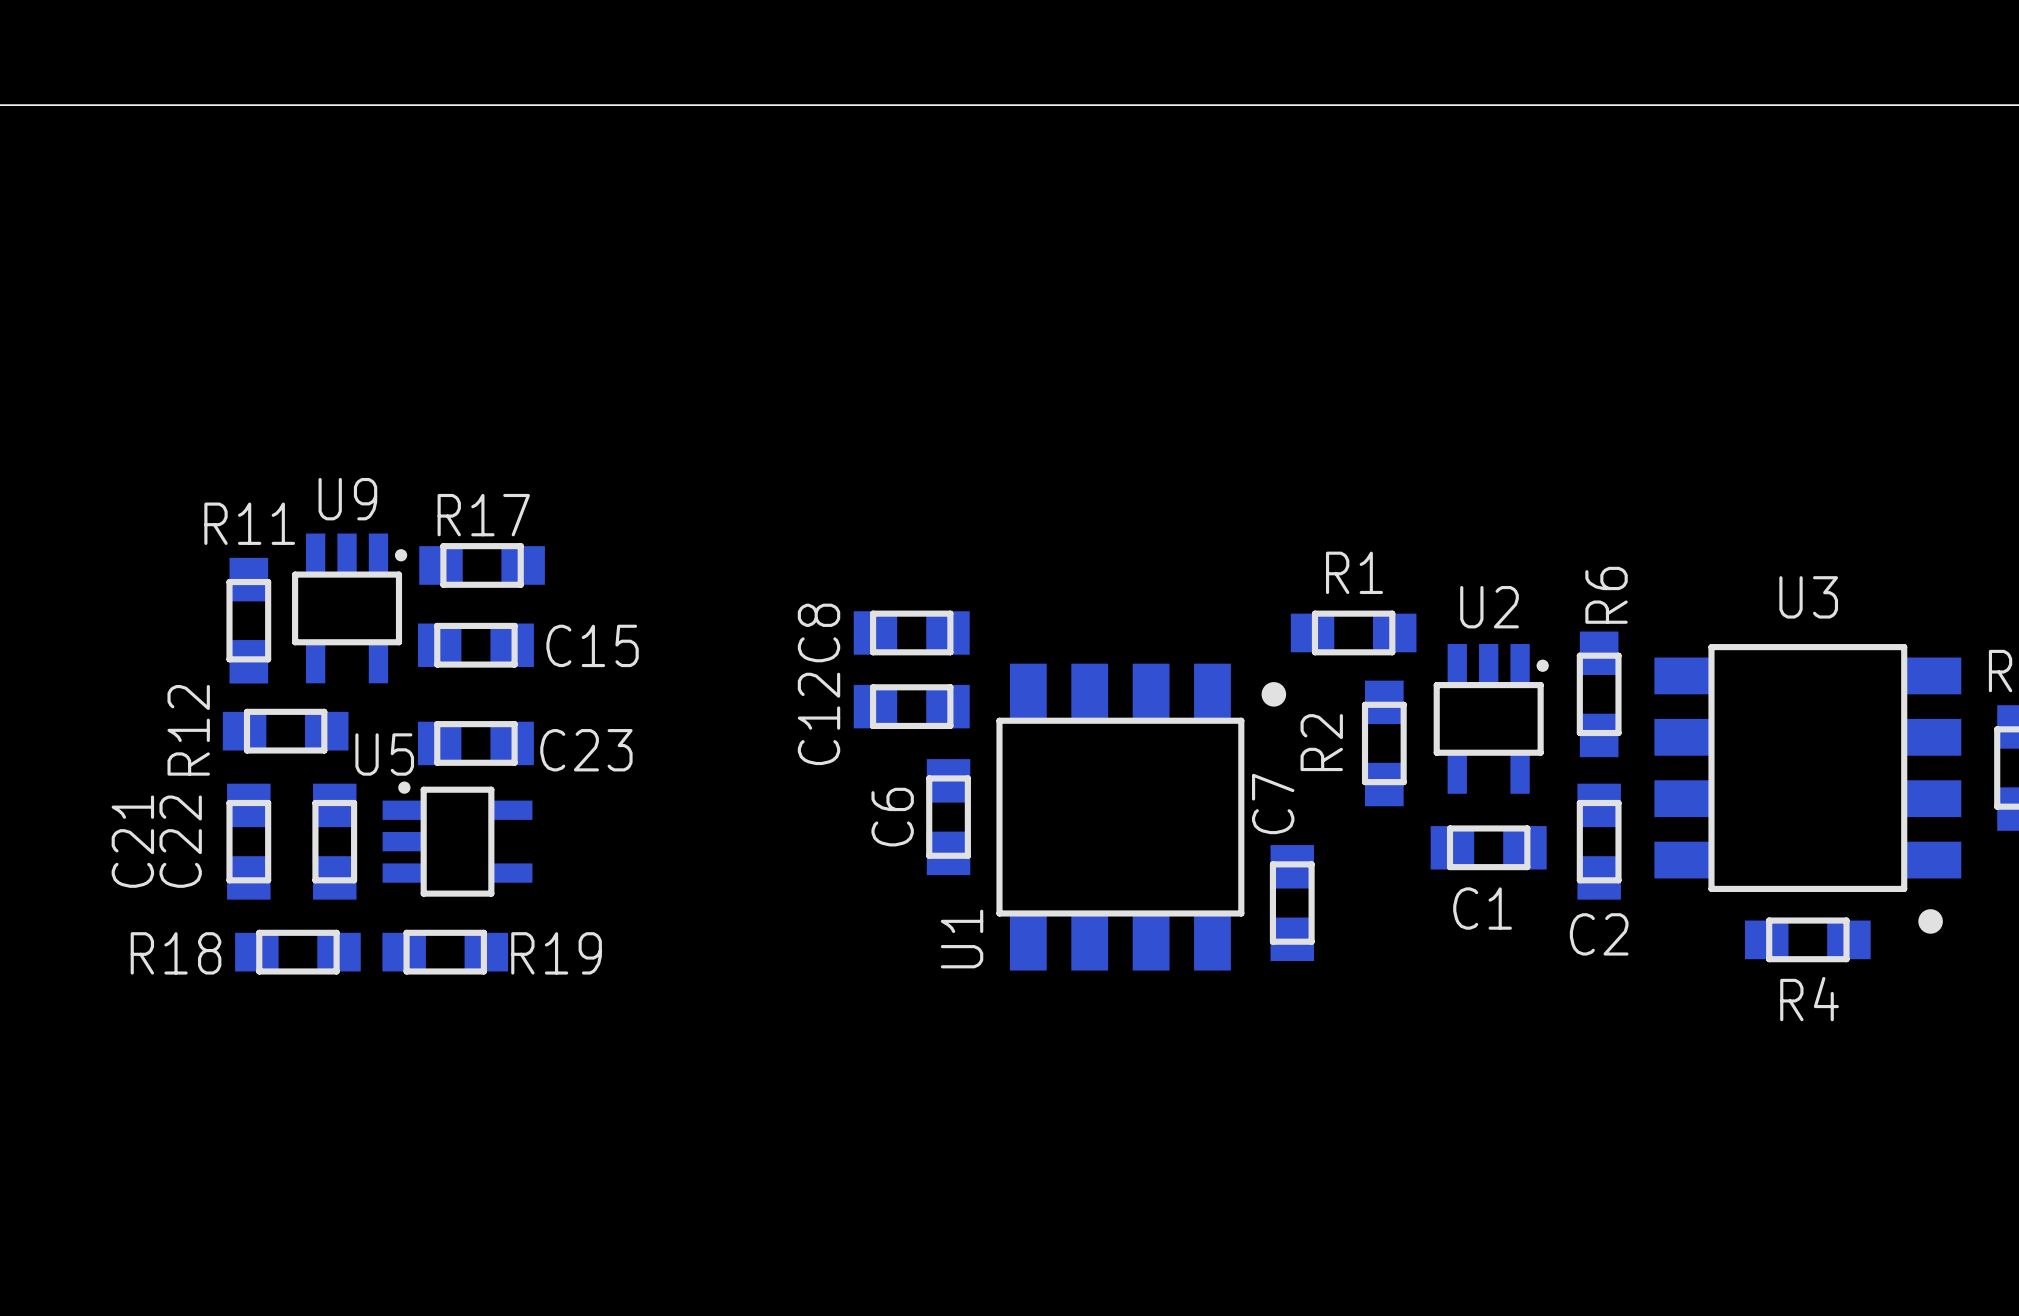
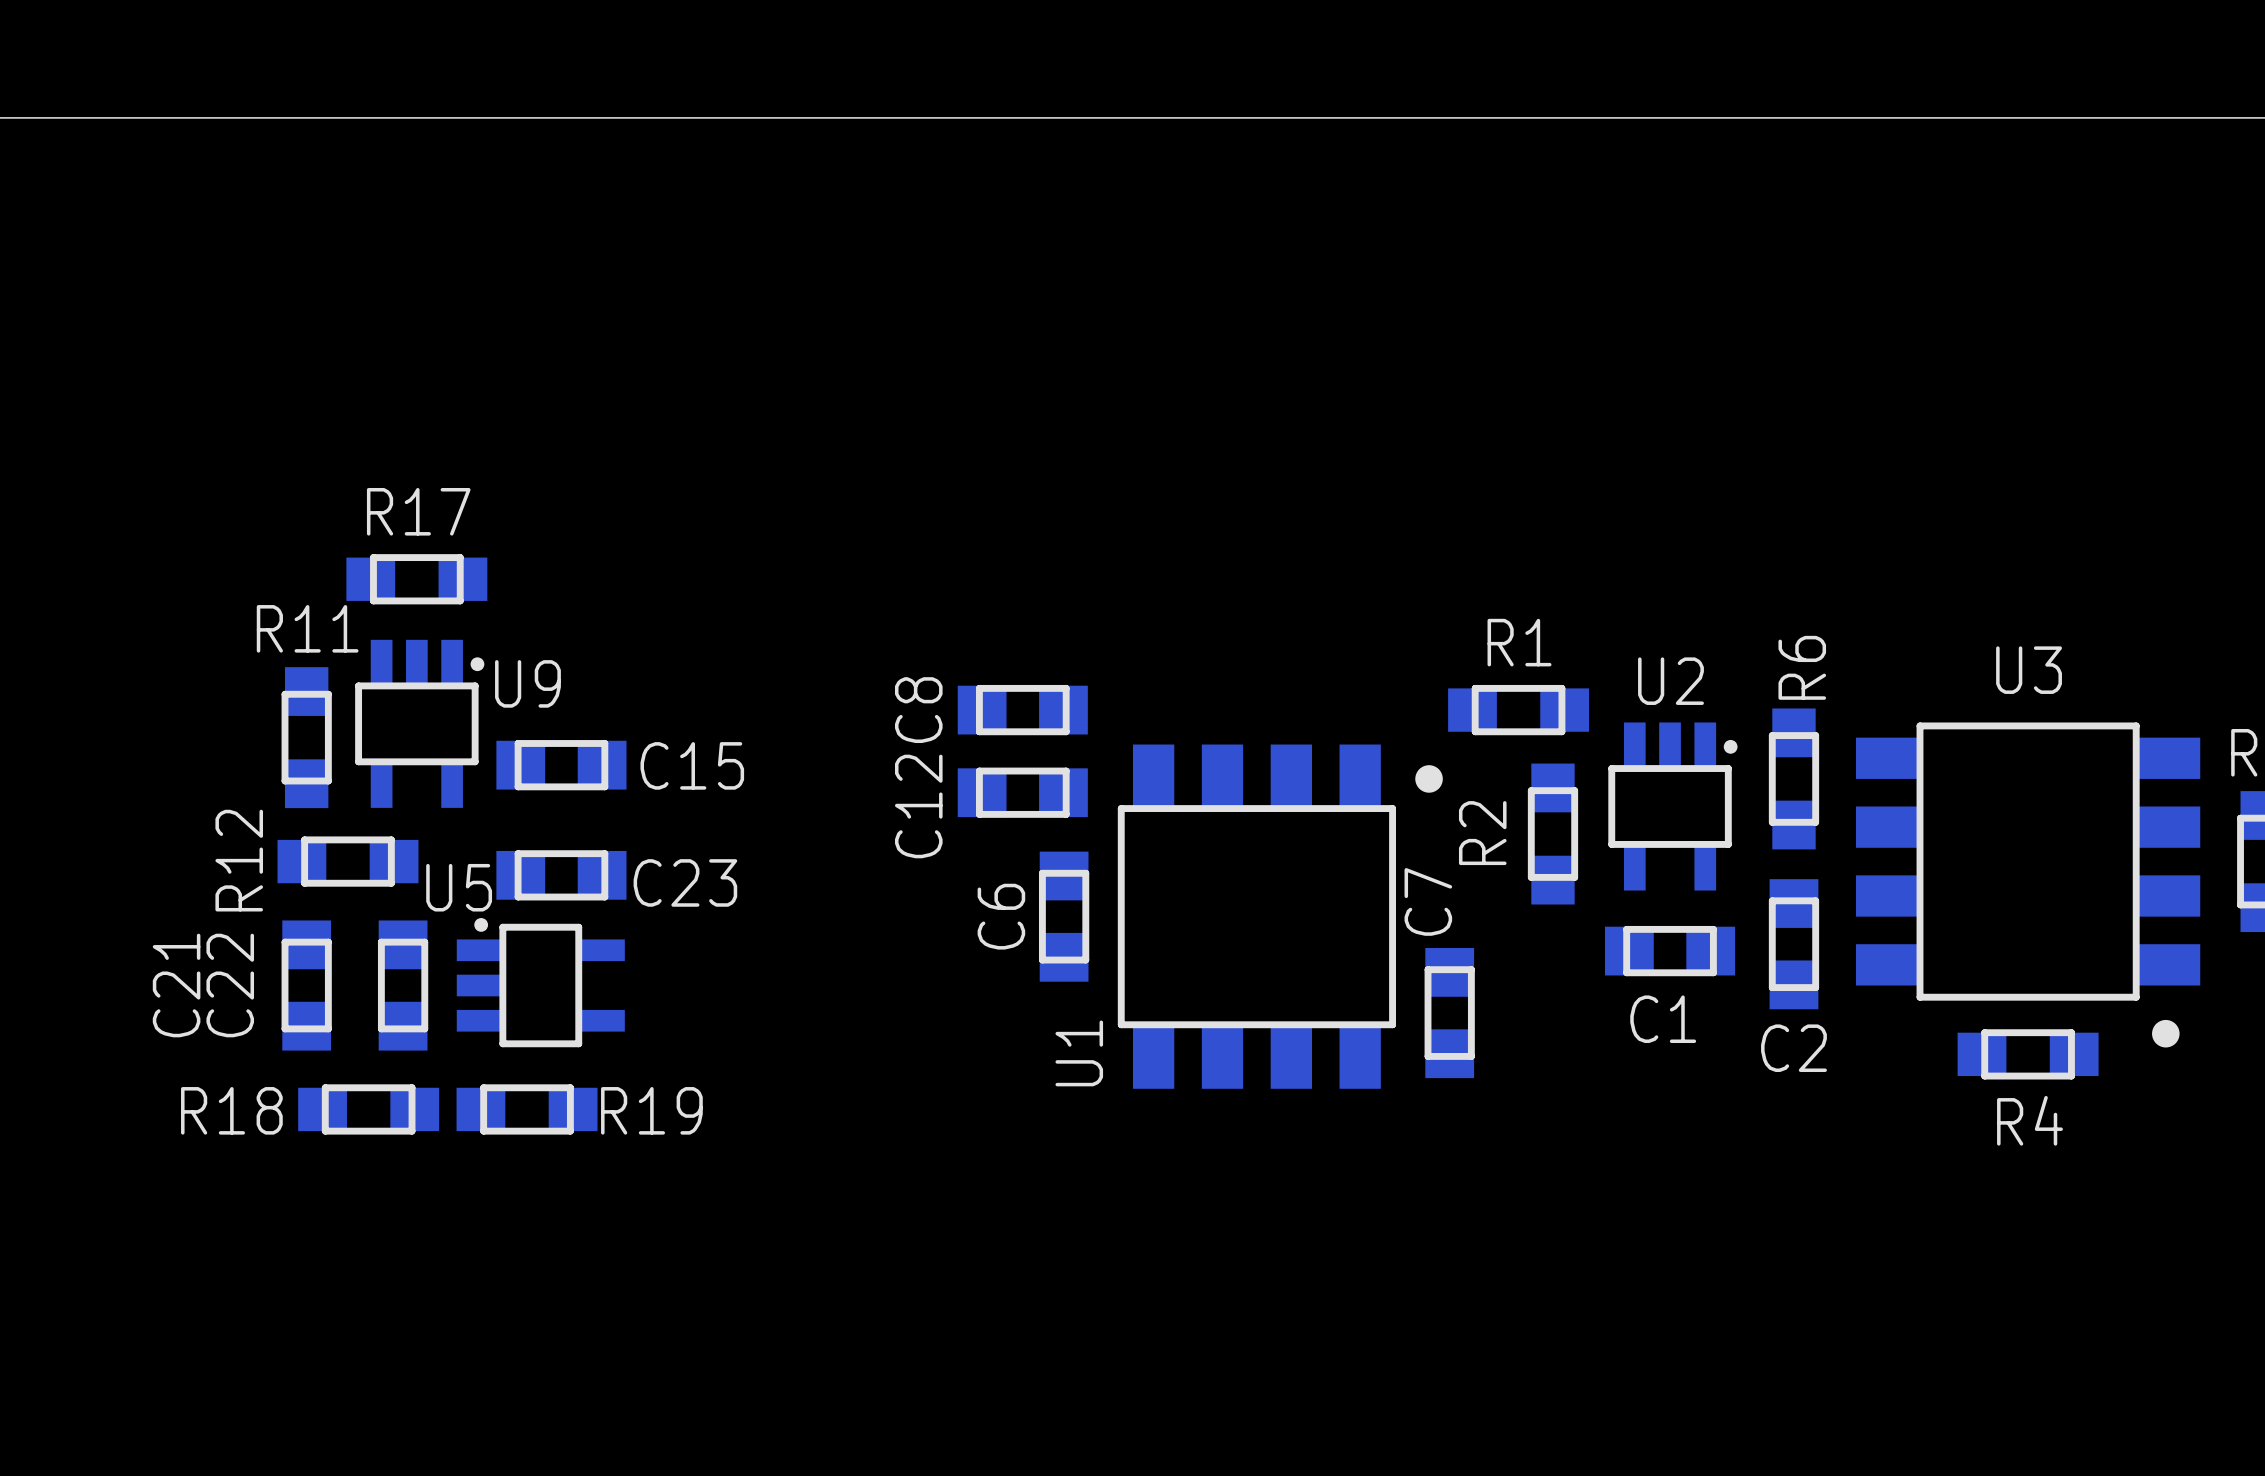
U9 name position: U9 (347, 499) -> U9 (527, 683)
R17 name position: R17 (483, 515) -> R17 (418, 511)
R17 position: (482, 565) -> (416, 579)
U9 position: (349, 608) -> (419, 723)
R11 position: (248, 620) -> (306, 737)
C15 position: (475, 645) -> (561, 765)
R12 position: (285, 731) -> (348, 861)
C23 position: (475, 743) -> (561, 875)
U5 position: (457, 839) -> (540, 982)
C21 position: (248, 841) -> (306, 985)
C22 position: (334, 841) -> (403, 985)
R18 position: (297, 952) -> (368, 1109)
R19 position: (445, 952) -> (527, 1109)

